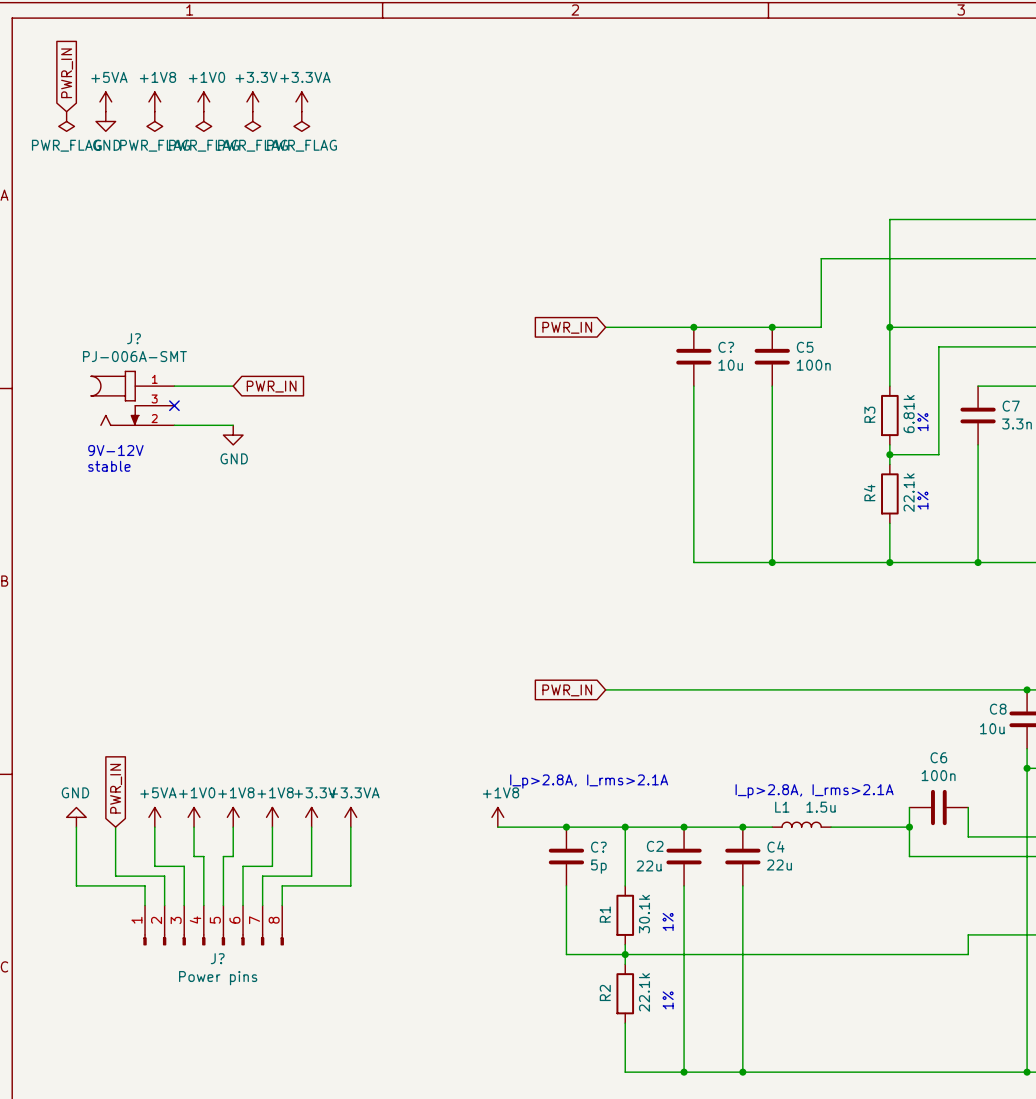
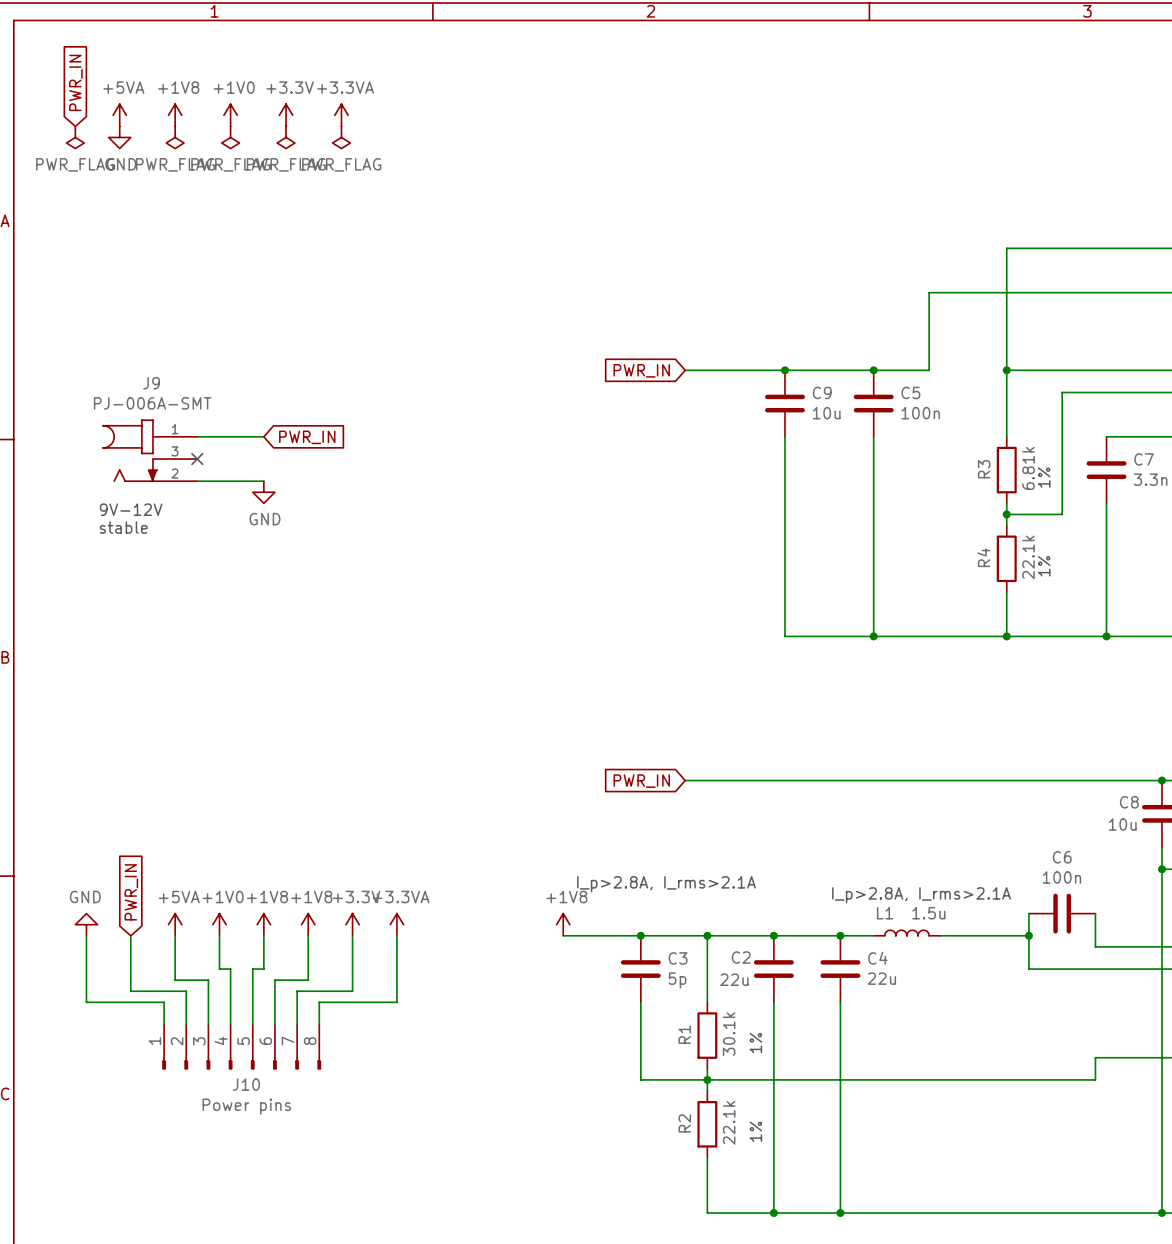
J? name: J? (134, 338) -> J9 (151, 383)
C? name: C? (726, 347) -> C9 (822, 392)
C? name: C? (598, 847) -> C3 (678, 958)
J? name: J? (217, 958) -> J10 (246, 1084)

